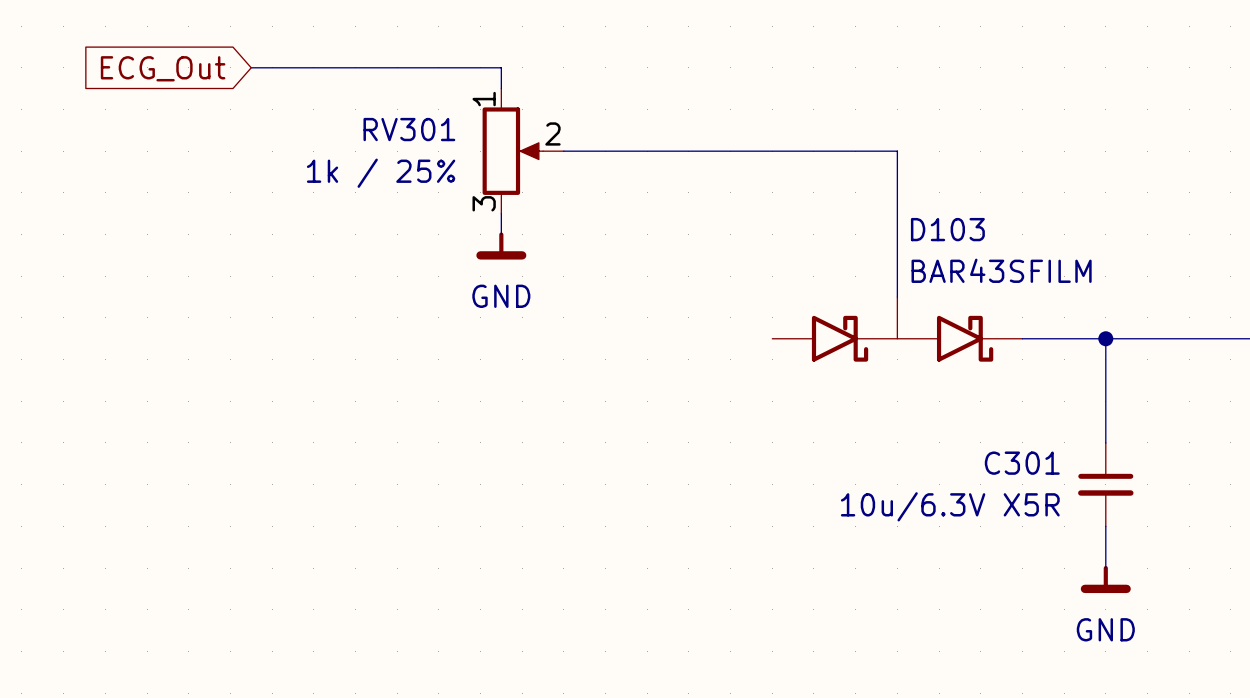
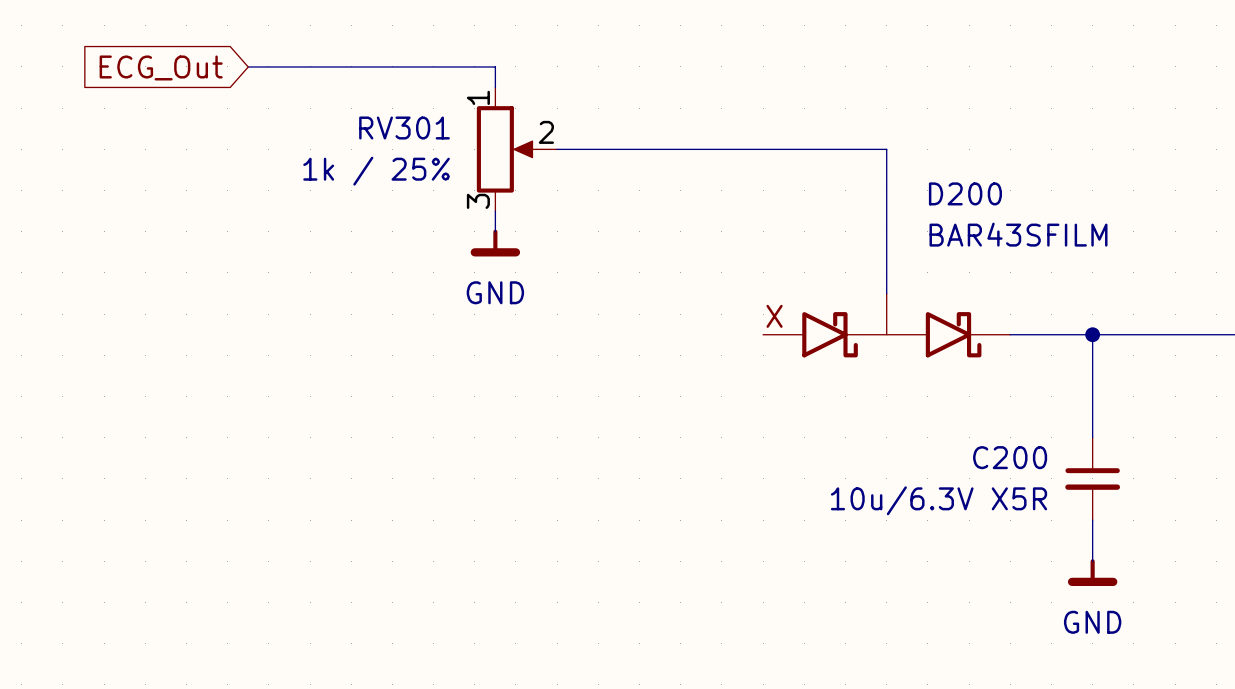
D103 name: D103 (947, 229) -> D200 (965, 193)
D103 value position: BAR43SFILM (1001, 270) -> BAR43SFILM (1018, 234)
label: none -> X (774, 316)
C301 name: C301 (1022, 463) -> C200 (1010, 457)

